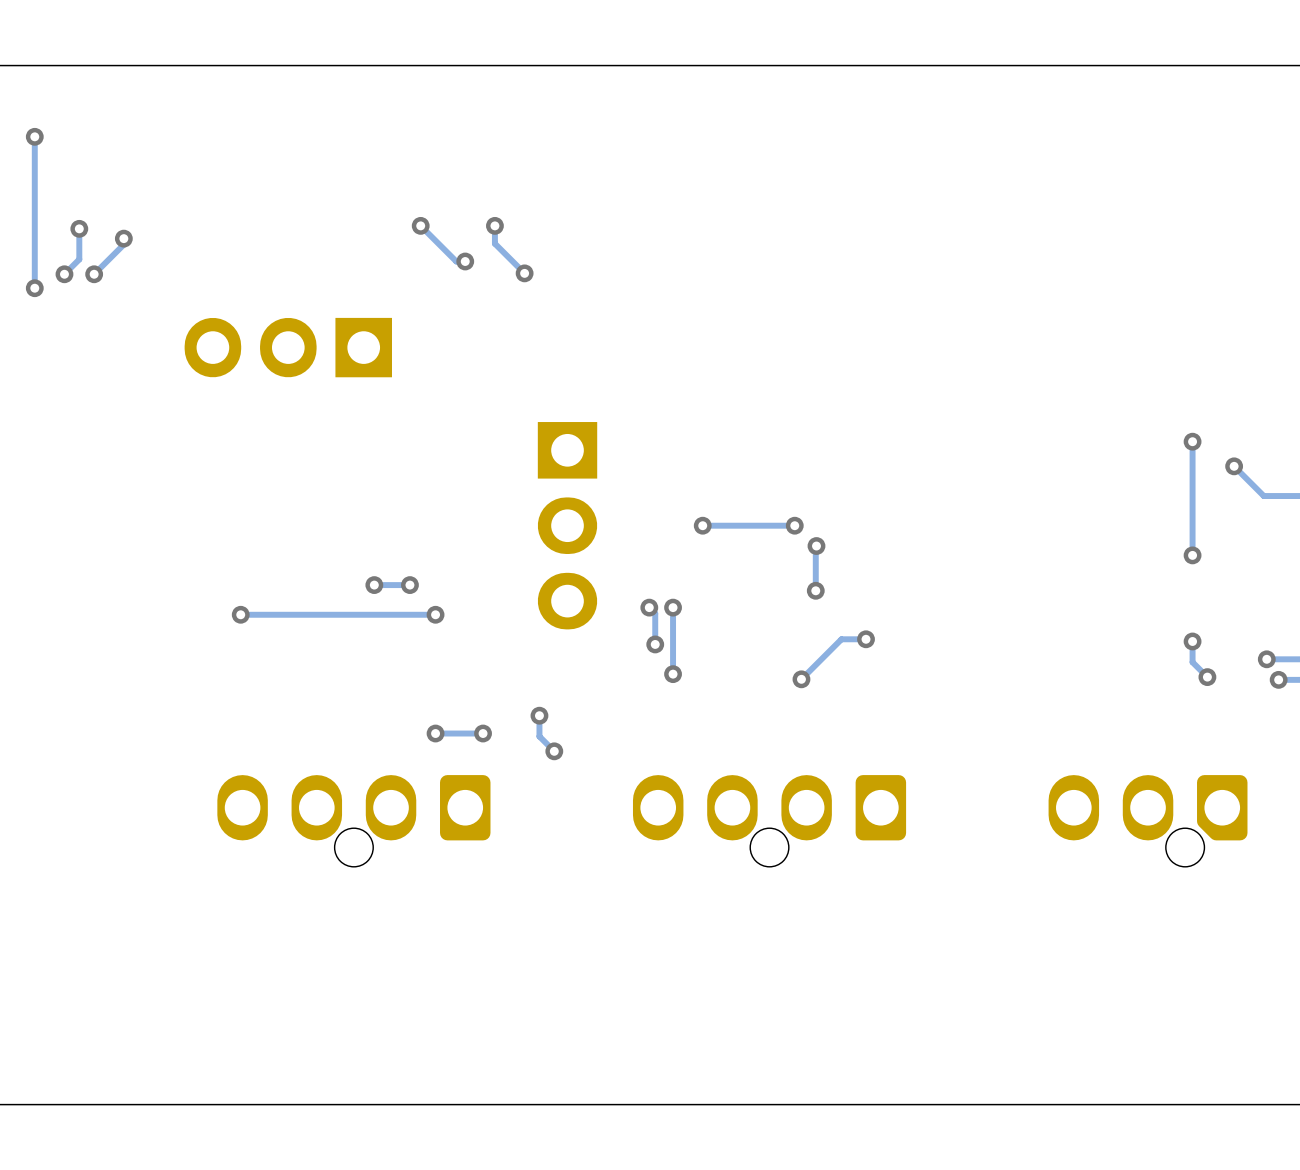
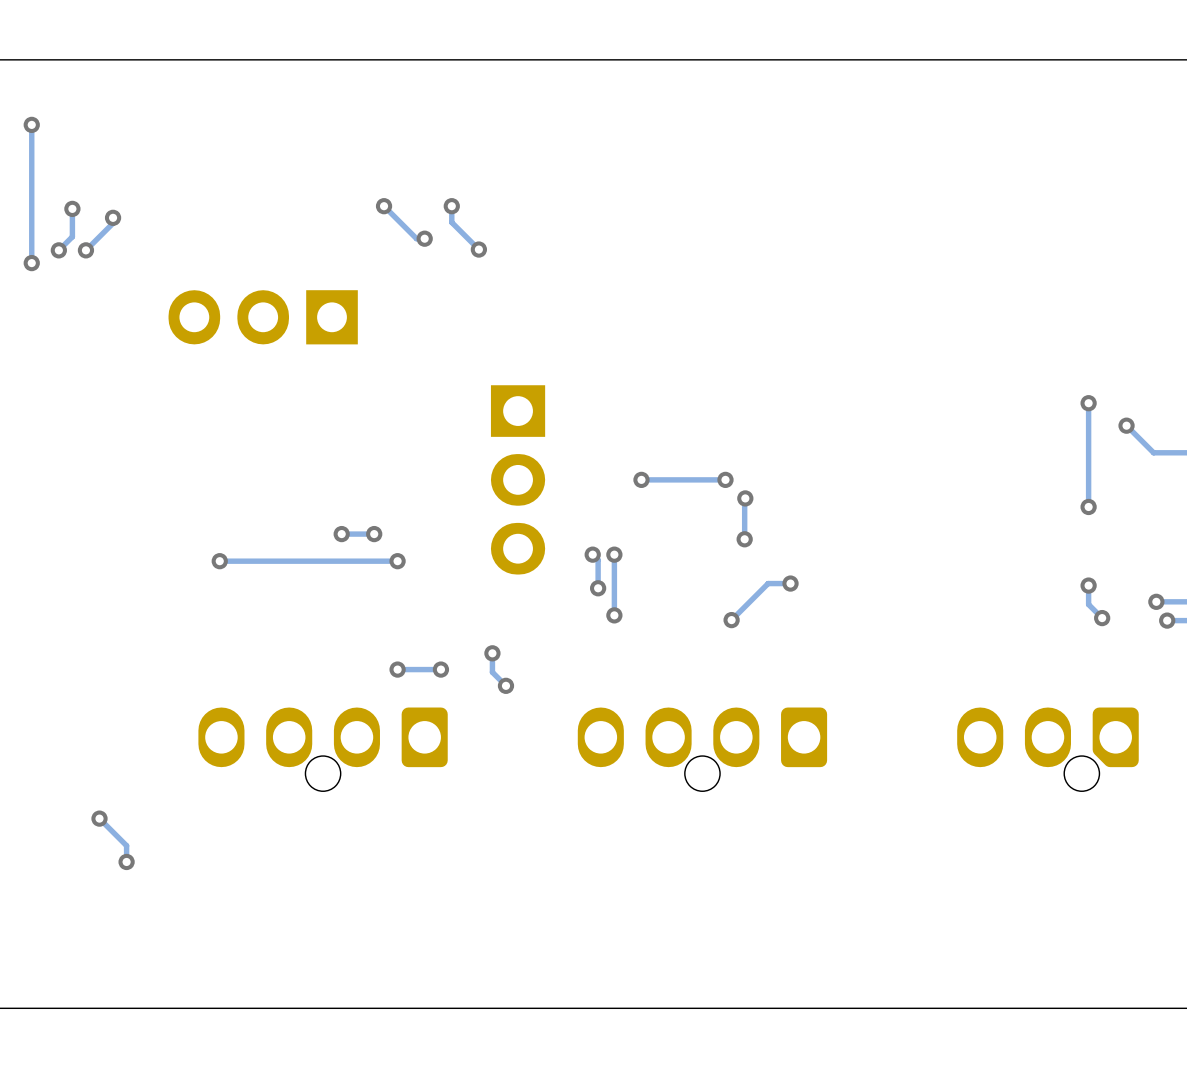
track: none -> (99, 818) (126, 845) (126, 861)
via: none -> (99, 818)
via: none -> (126, 861)

